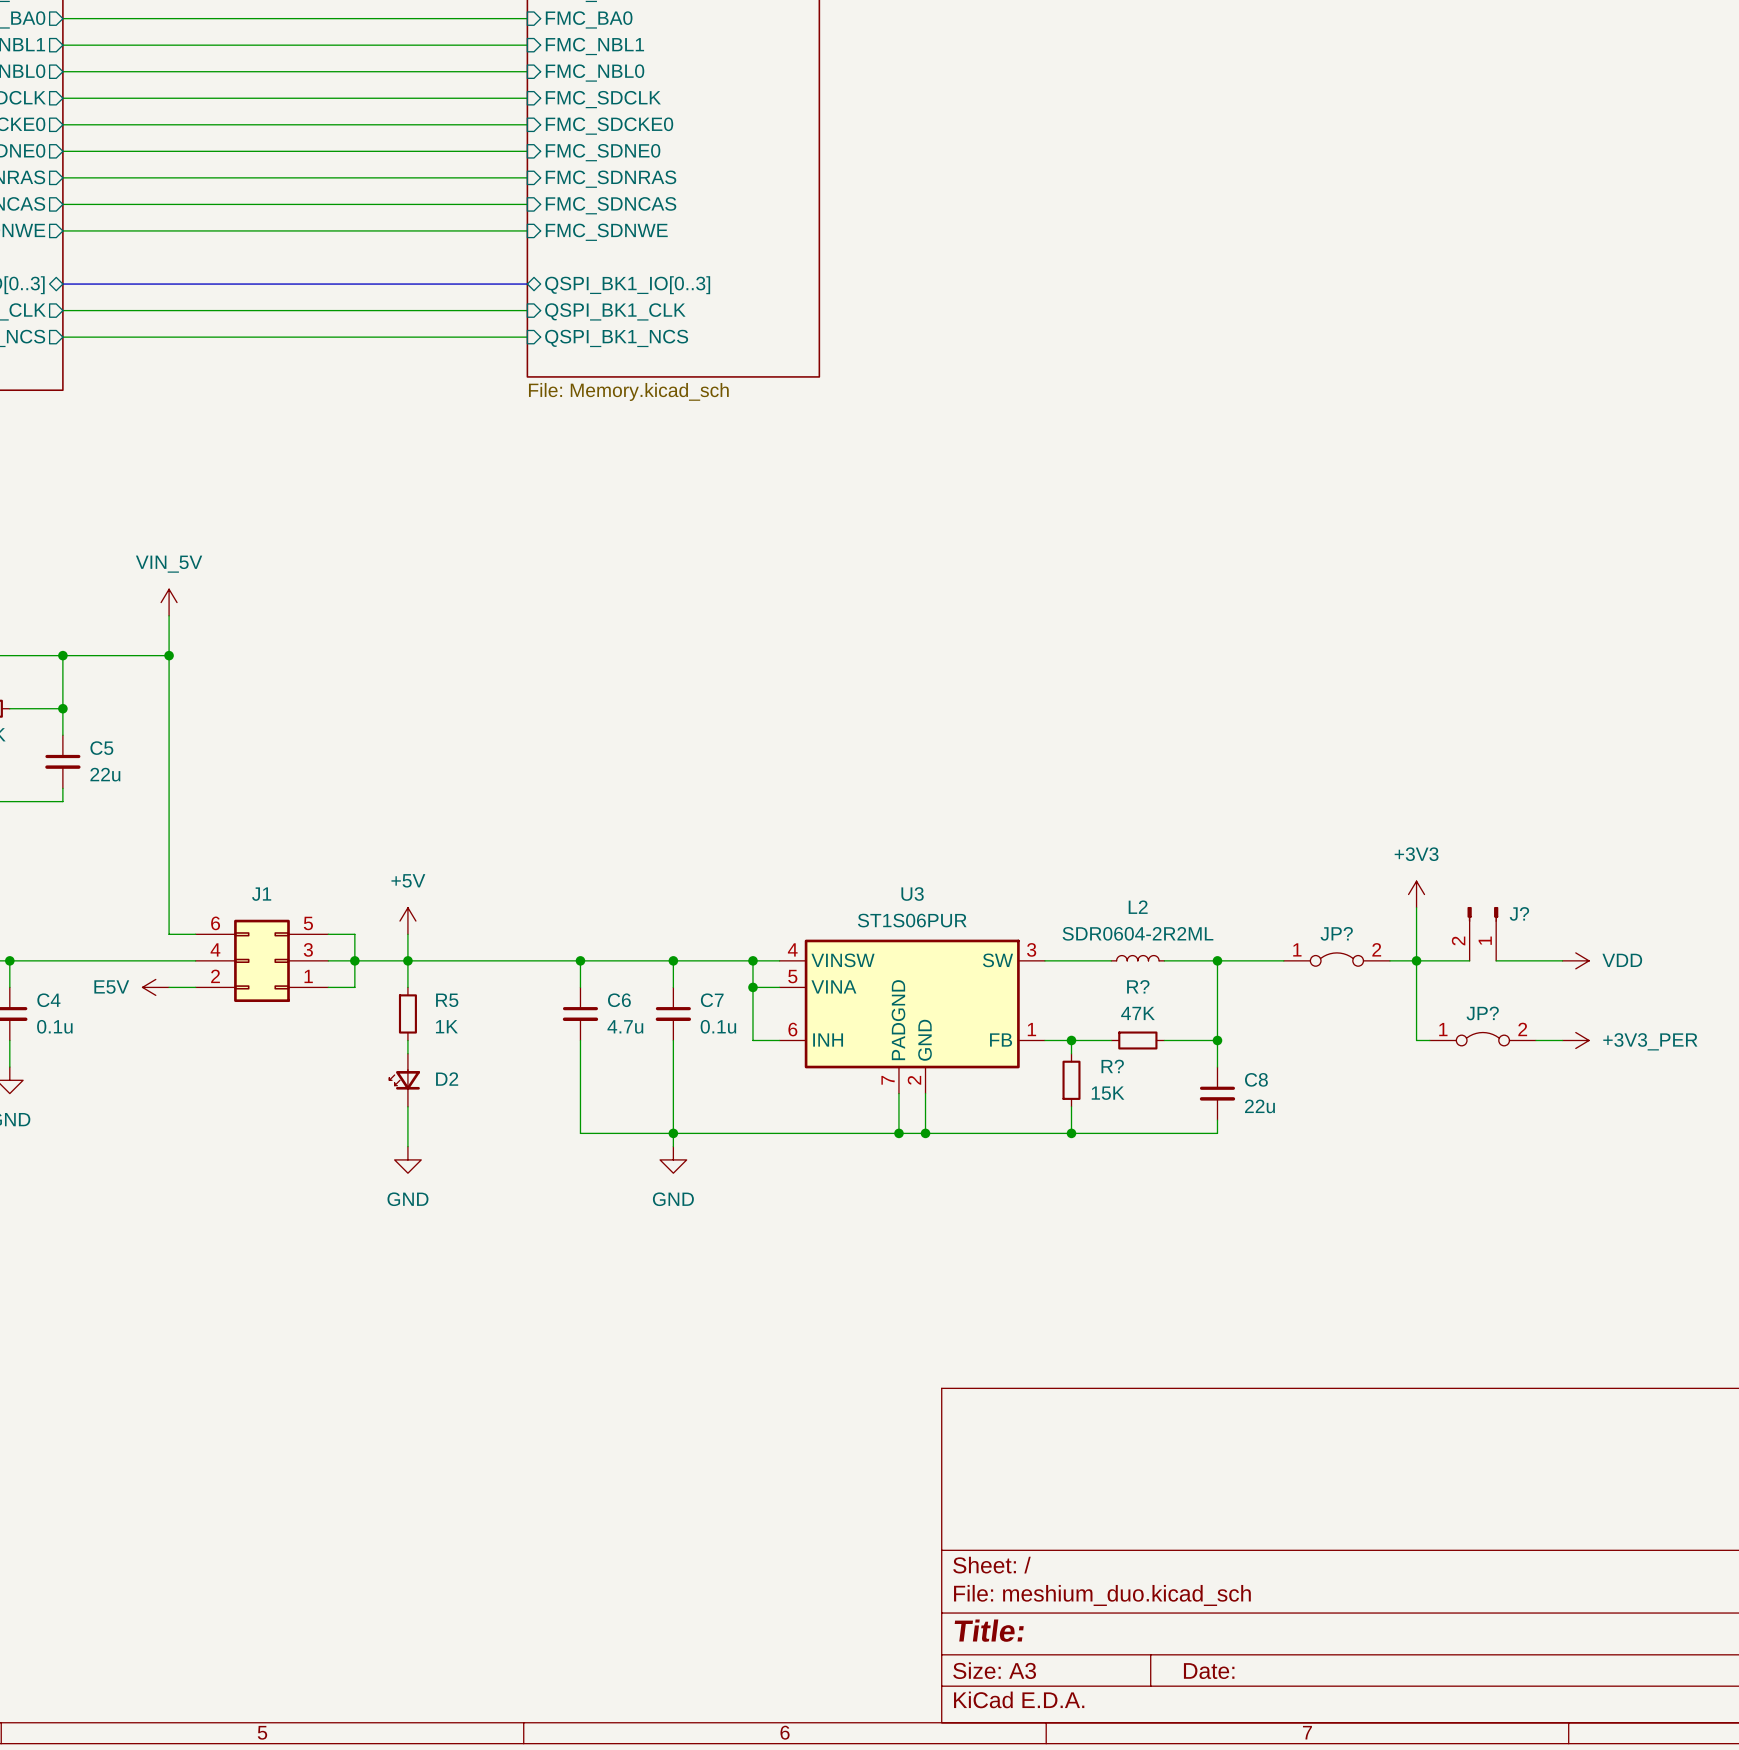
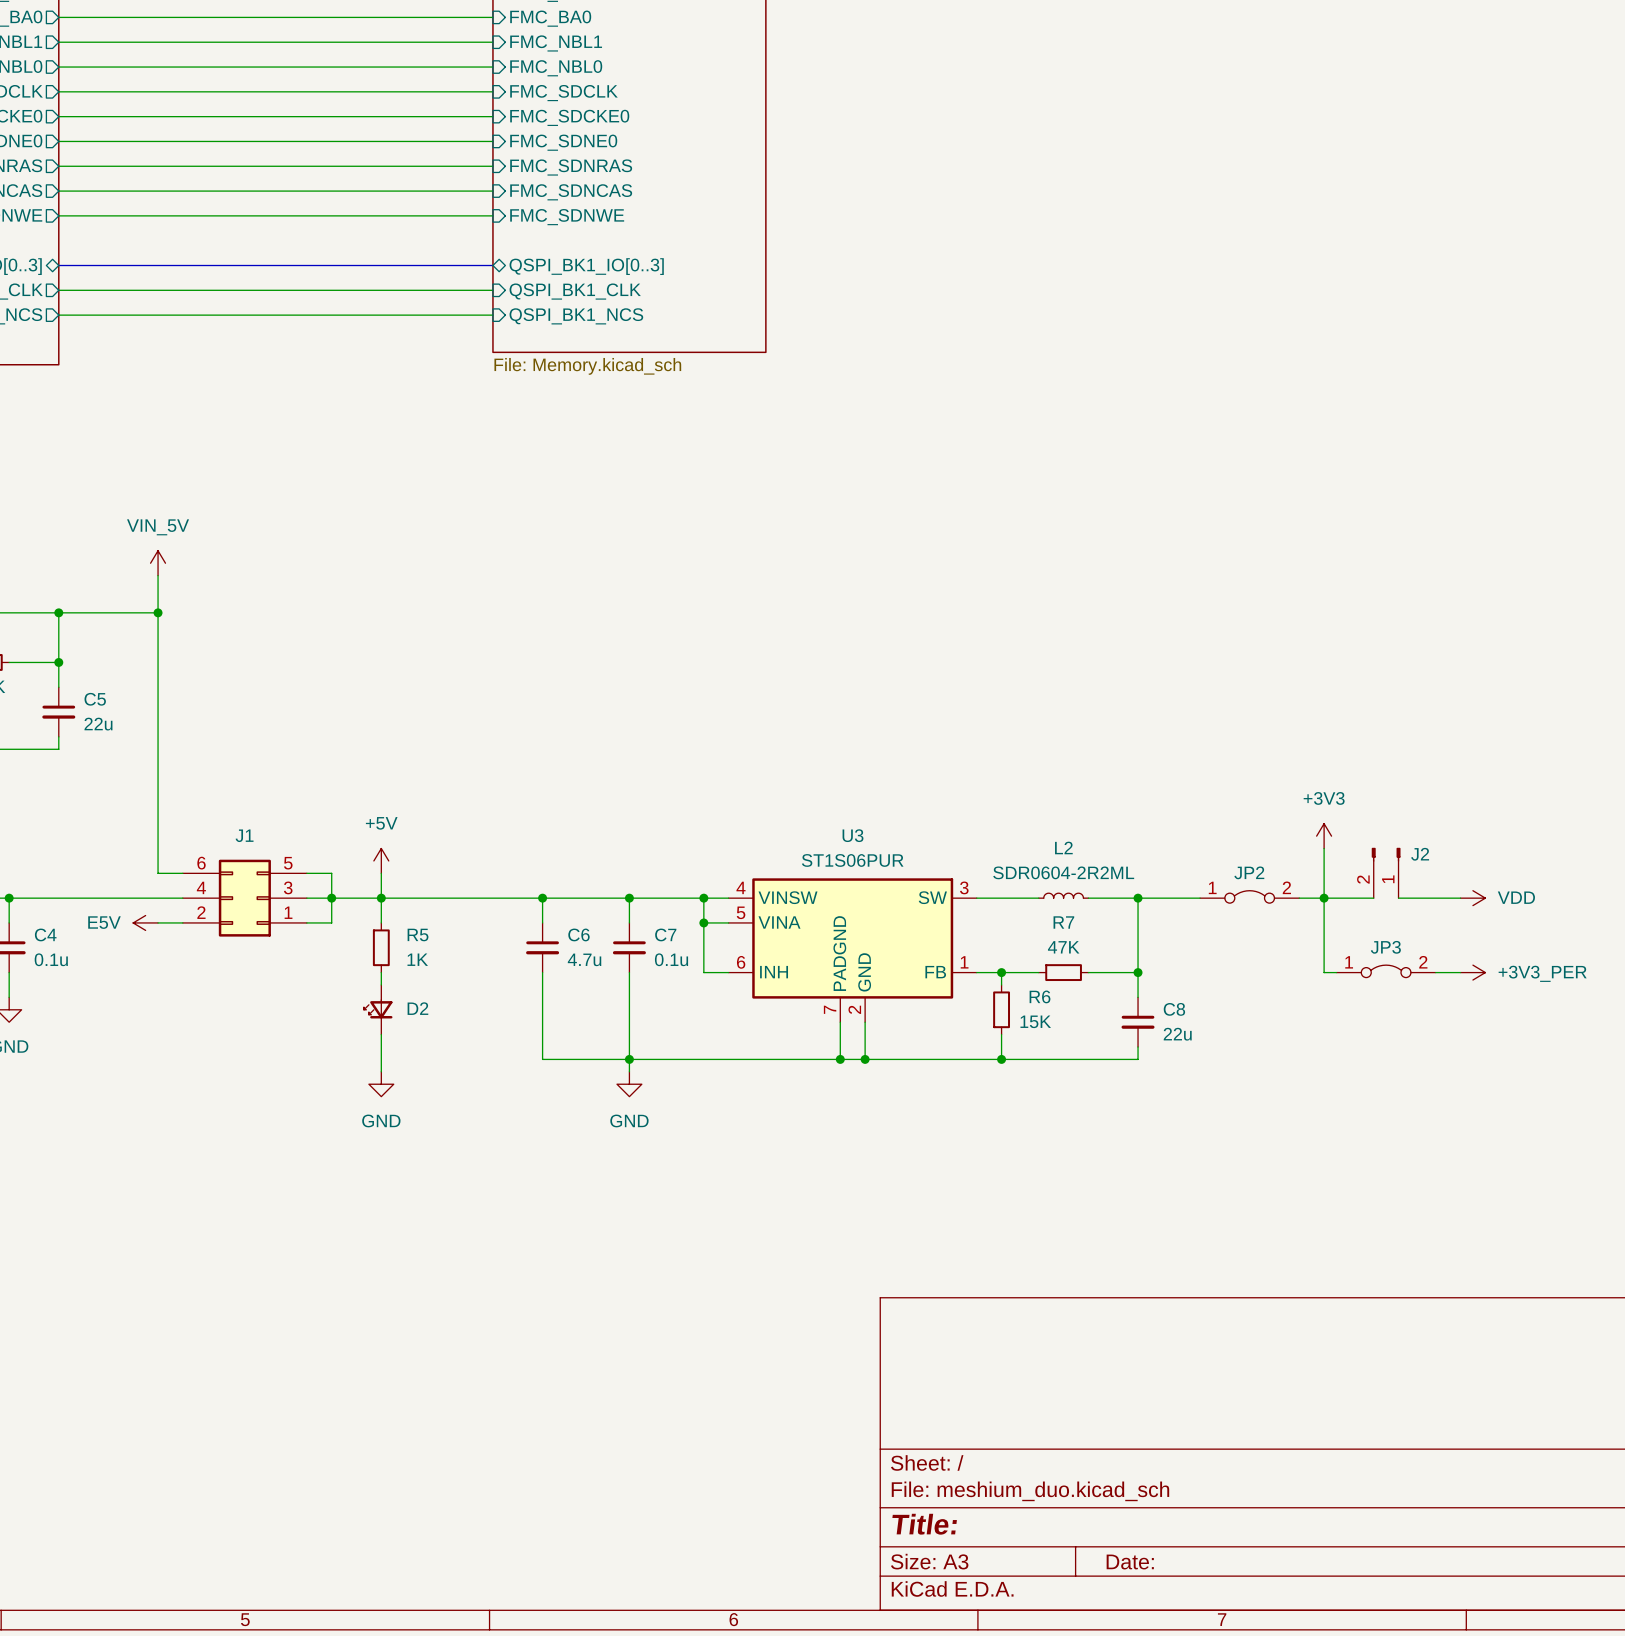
J? name: J? (1519, 913) -> J2 (1420, 854)
JP? name: JP? (1336, 933) -> JP2 (1249, 872)
R? name: R? (1138, 986) -> R7 (1063, 922)
JP? name: JP? (1482, 1013) -> JP3 (1385, 947)
R? name: R? (1112, 1066) -> R6 (1040, 996)

